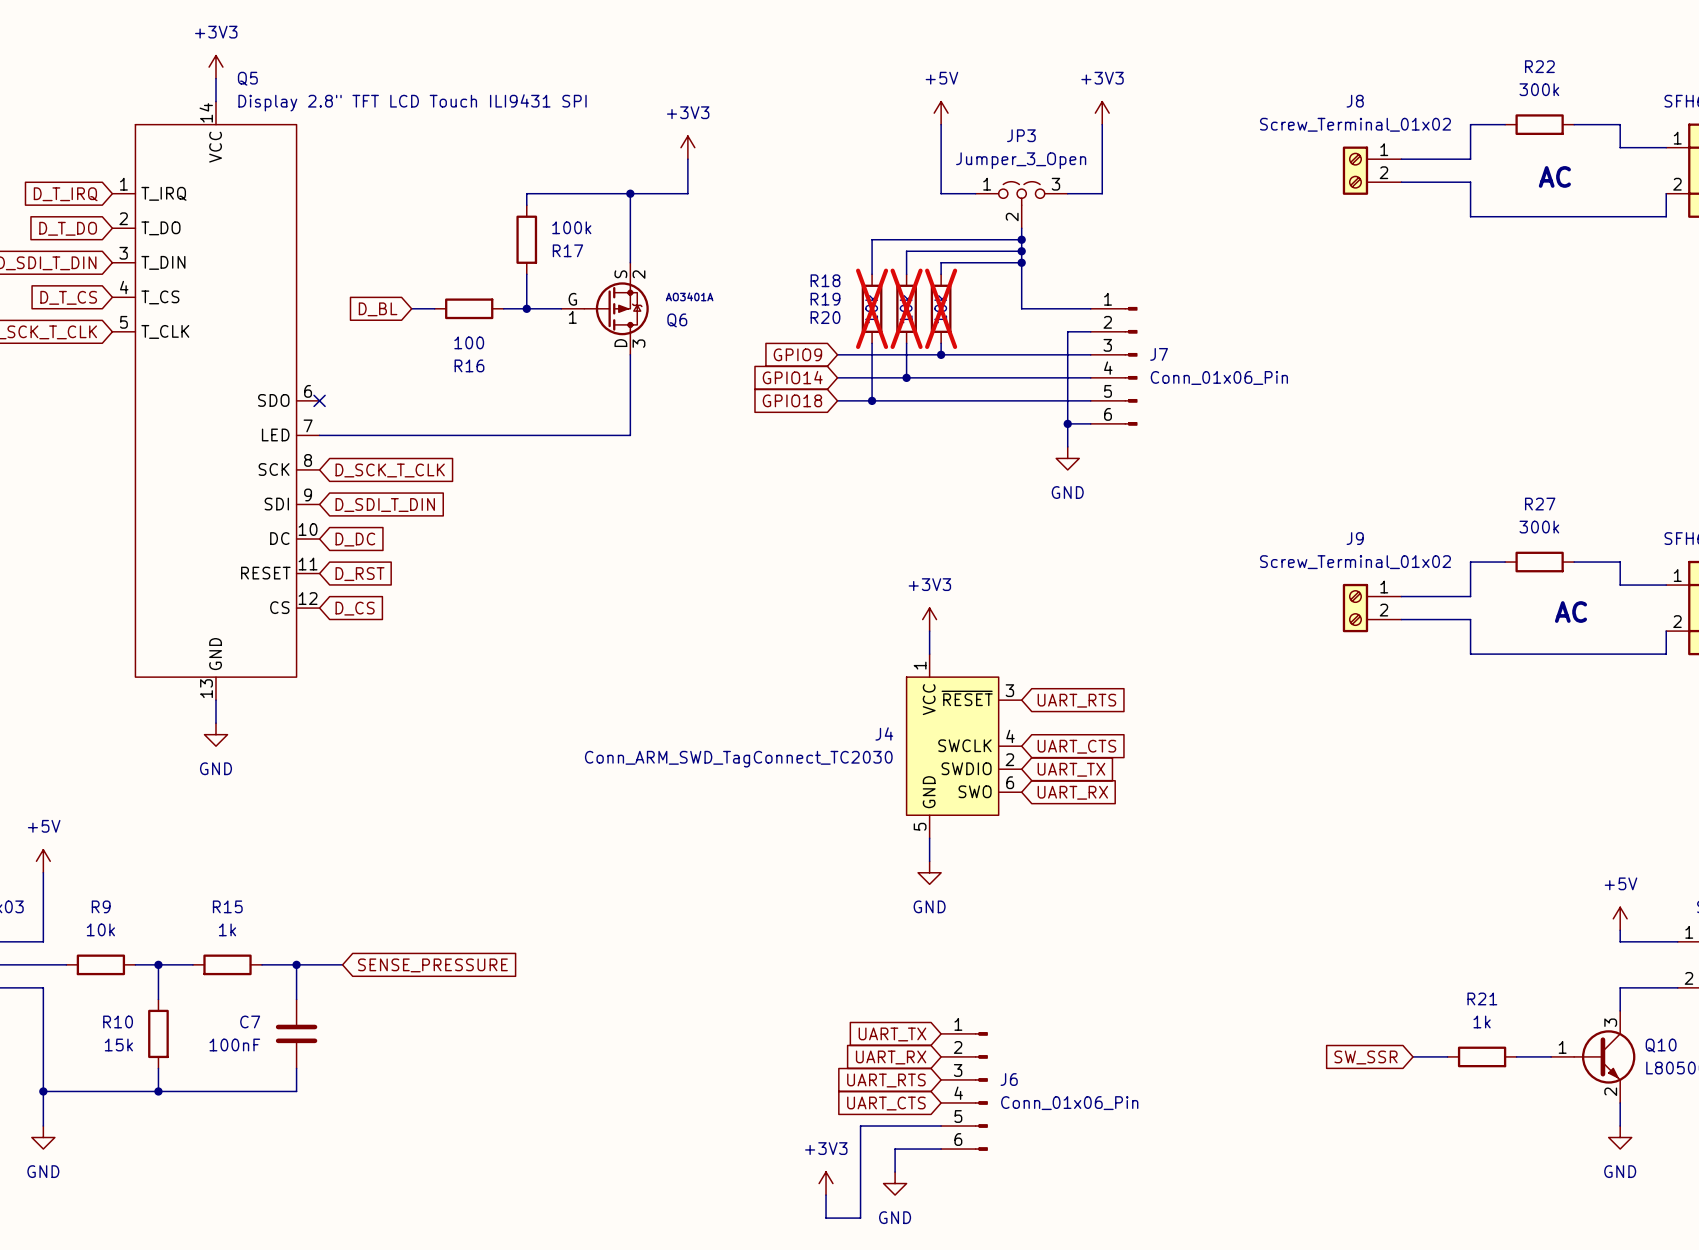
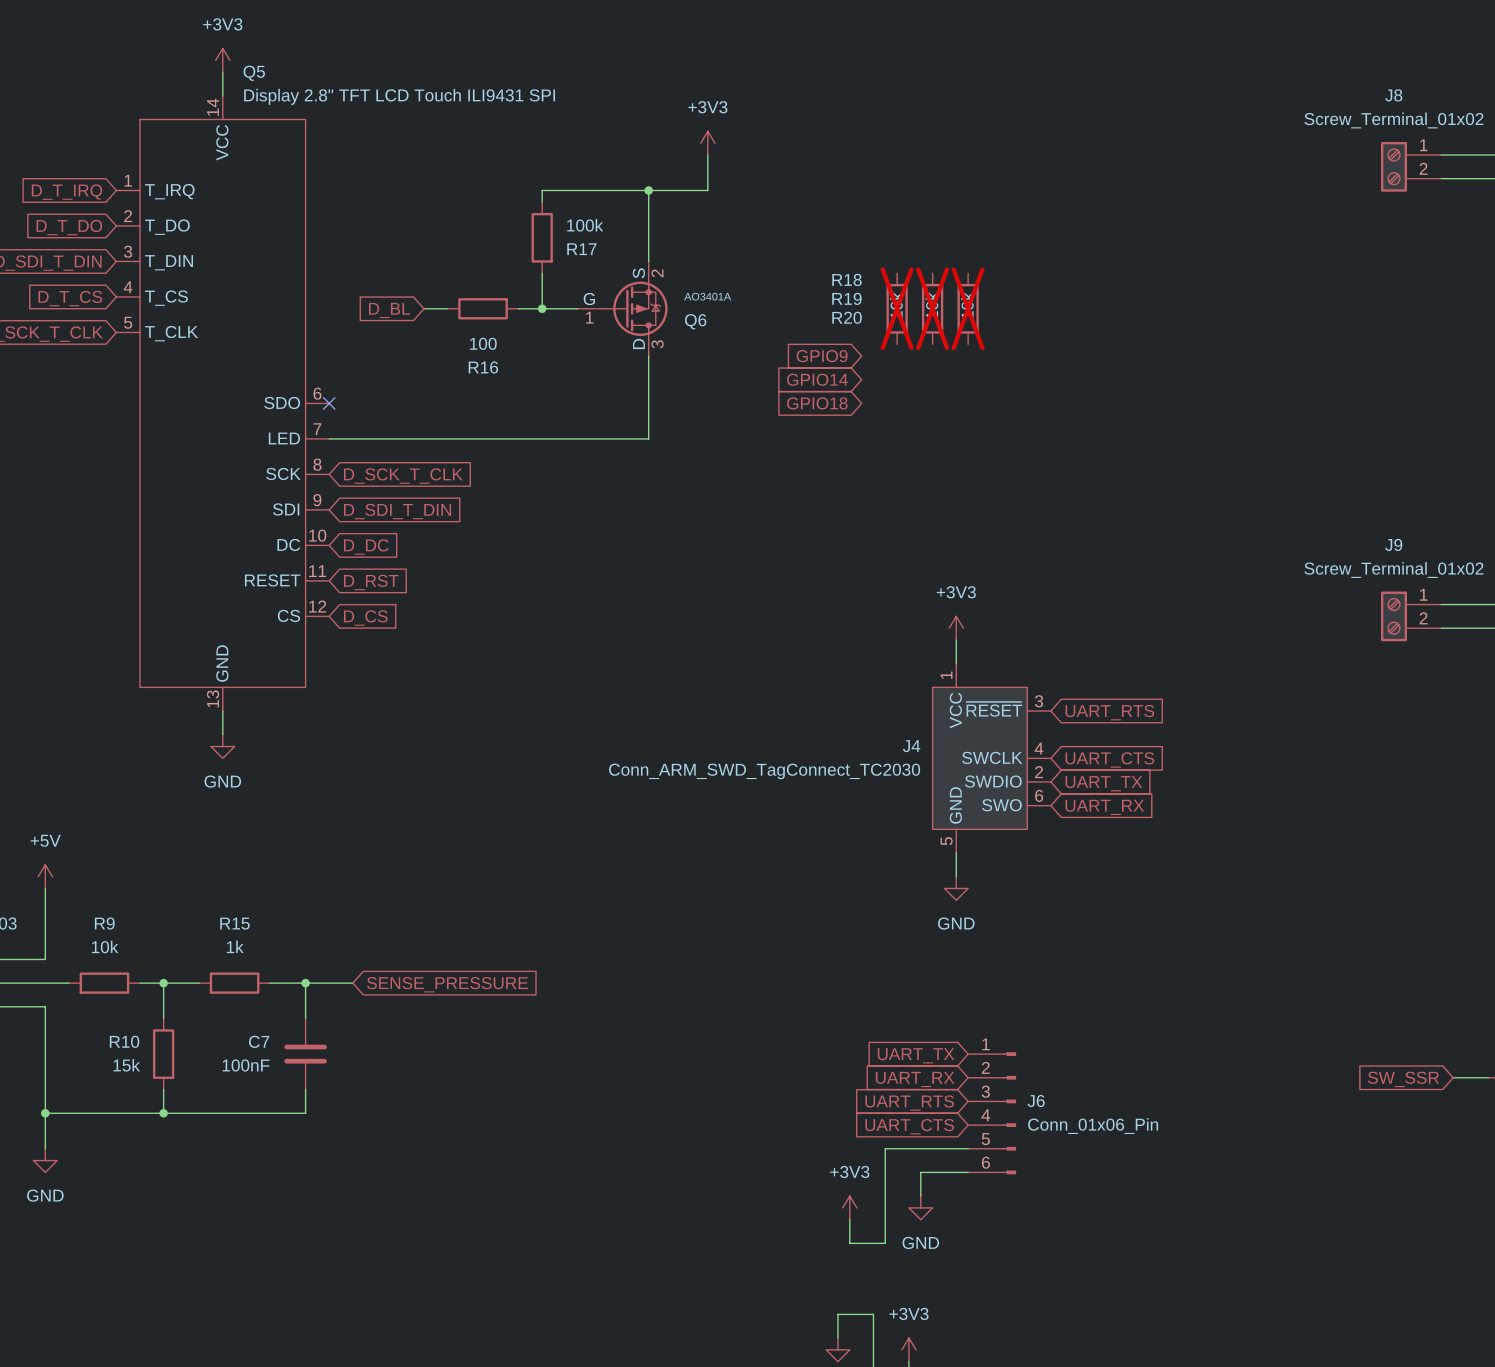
power symbol: +5V (941, 113) -> none
power symbol: +3V3 (1102, 113) -> none
wire: (941, 124) (941, 193) (975, 193) -> none
wire: (1102, 124) (1102, 193) (1067, 193) -> none
JP3: Jumper_3_Open (1021, 204) -> none
wire: (1021, 228) (1021, 308) (1090, 308) -> none
wire: (1021, 239) (872, 239) (872, 274) -> none
junction: (1021, 239) -> none
wire: (1021, 251) (906, 251) (906, 274) -> none
junction: (1021, 251) -> none
wire: (1021, 262) (941, 262) (941, 274) -> none
junction: (1021, 262) -> none
wire: (1090, 331) (1067, 331) (1067, 446) -> none
wire: (872, 343) (872, 400) -> none
wire: (906, 343) (906, 377) -> none
wire: (941, 343) (941, 354) -> none
wire: (837, 354) (1090, 354) -> none
junction: (941, 354) -> none
J7: Conn_01x06_Pin (1114, 366) -> none
wire: (837, 377) (1090, 377) -> none
junction: (906, 377) -> none
wire: (837, 400) (1090, 400) -> none
junction: (872, 400) -> none
wire: (1067, 423) (1090, 423) -> none
junction: (1067, 423) -> none
power symbol: GND (1067, 458) -> none

